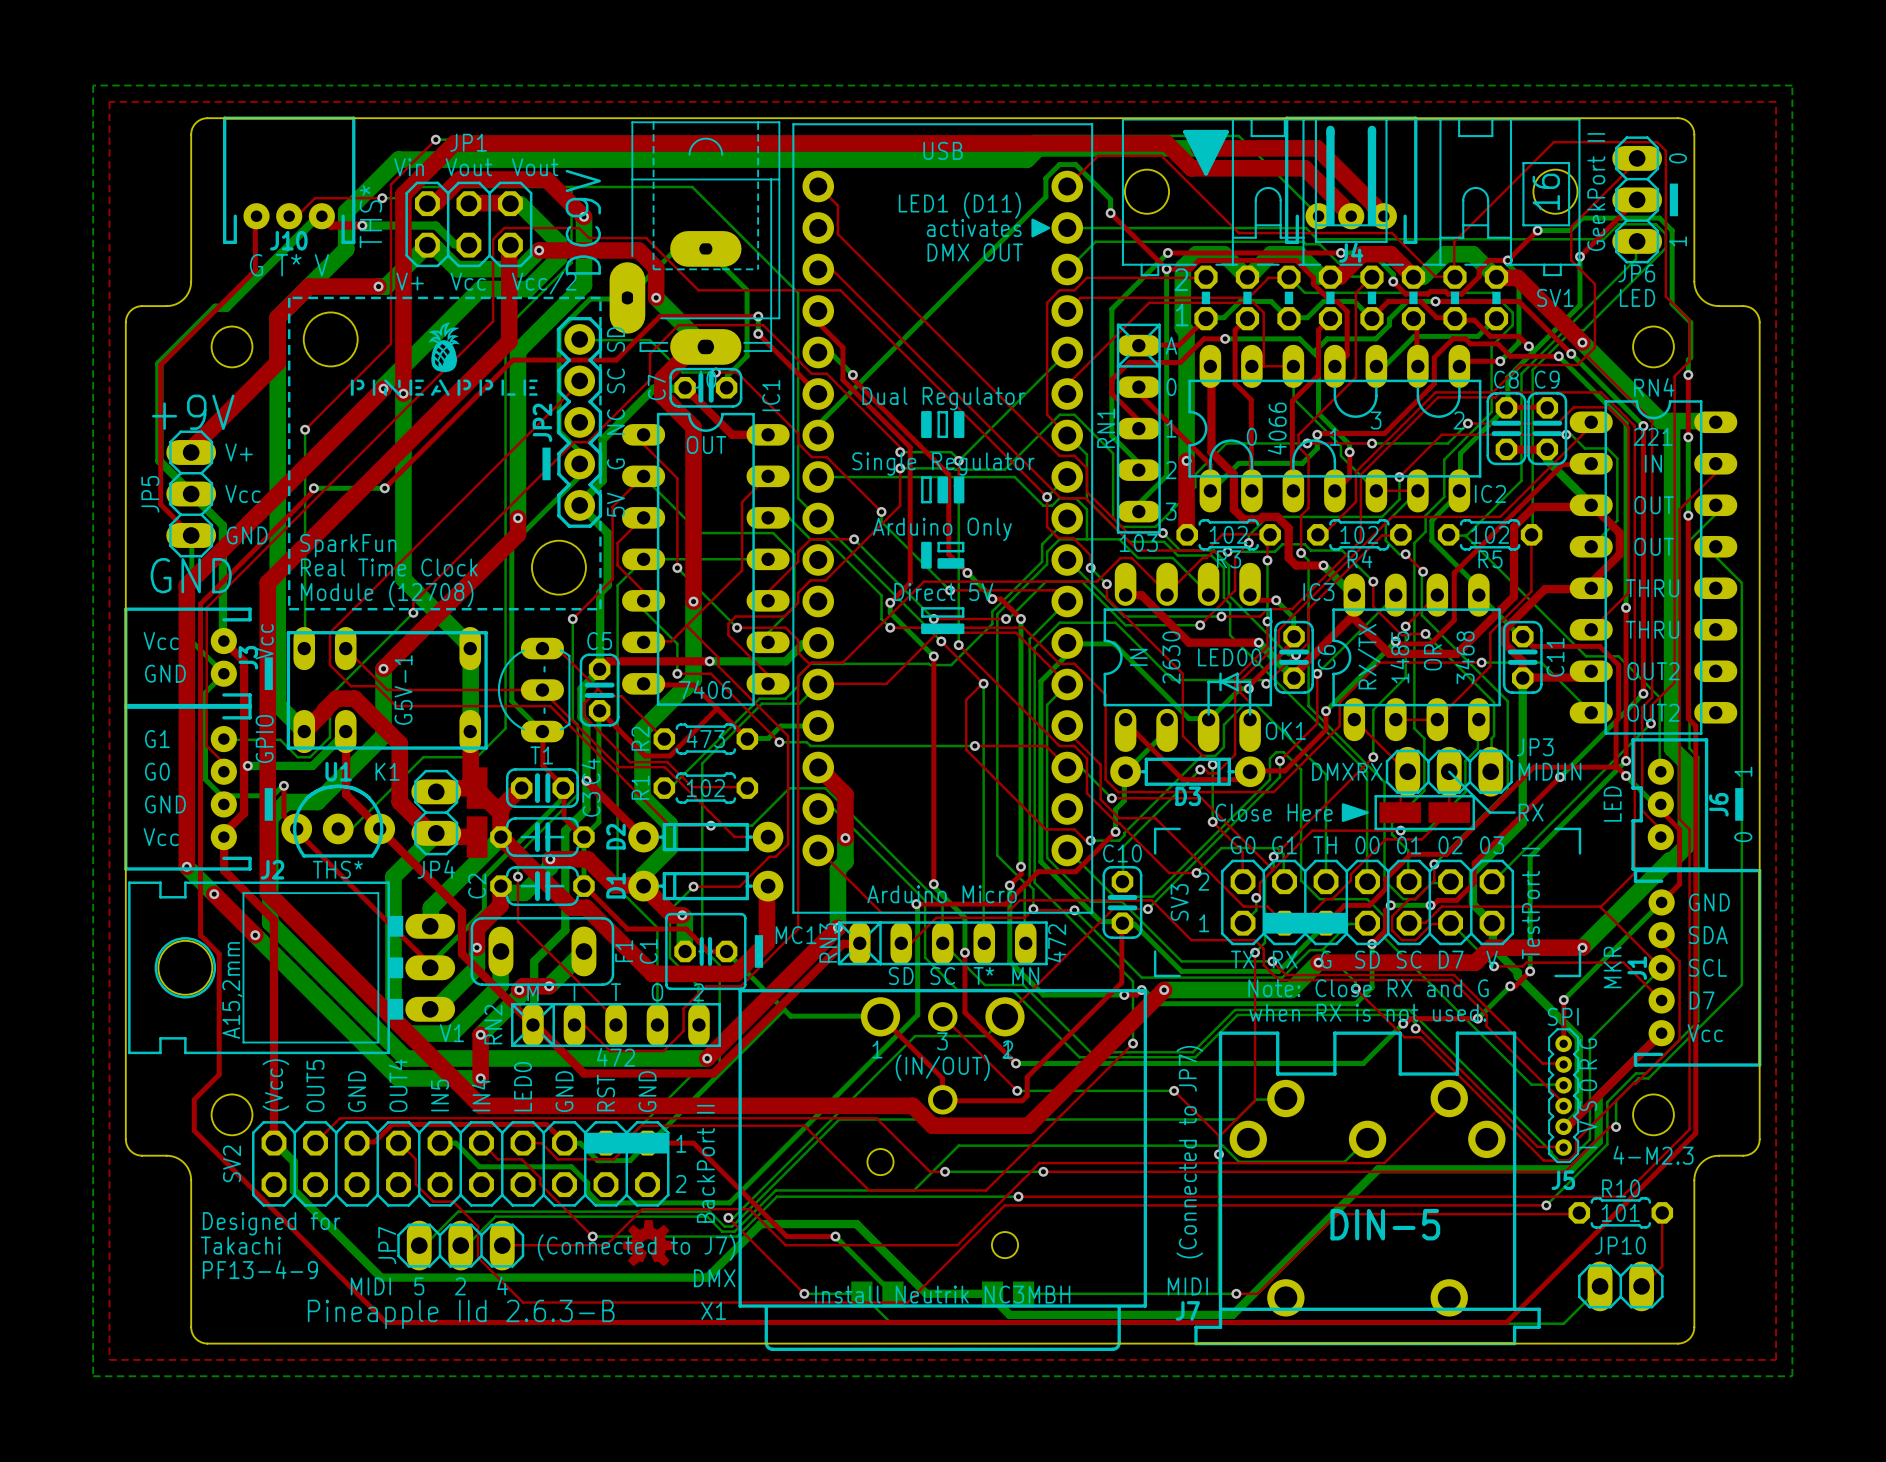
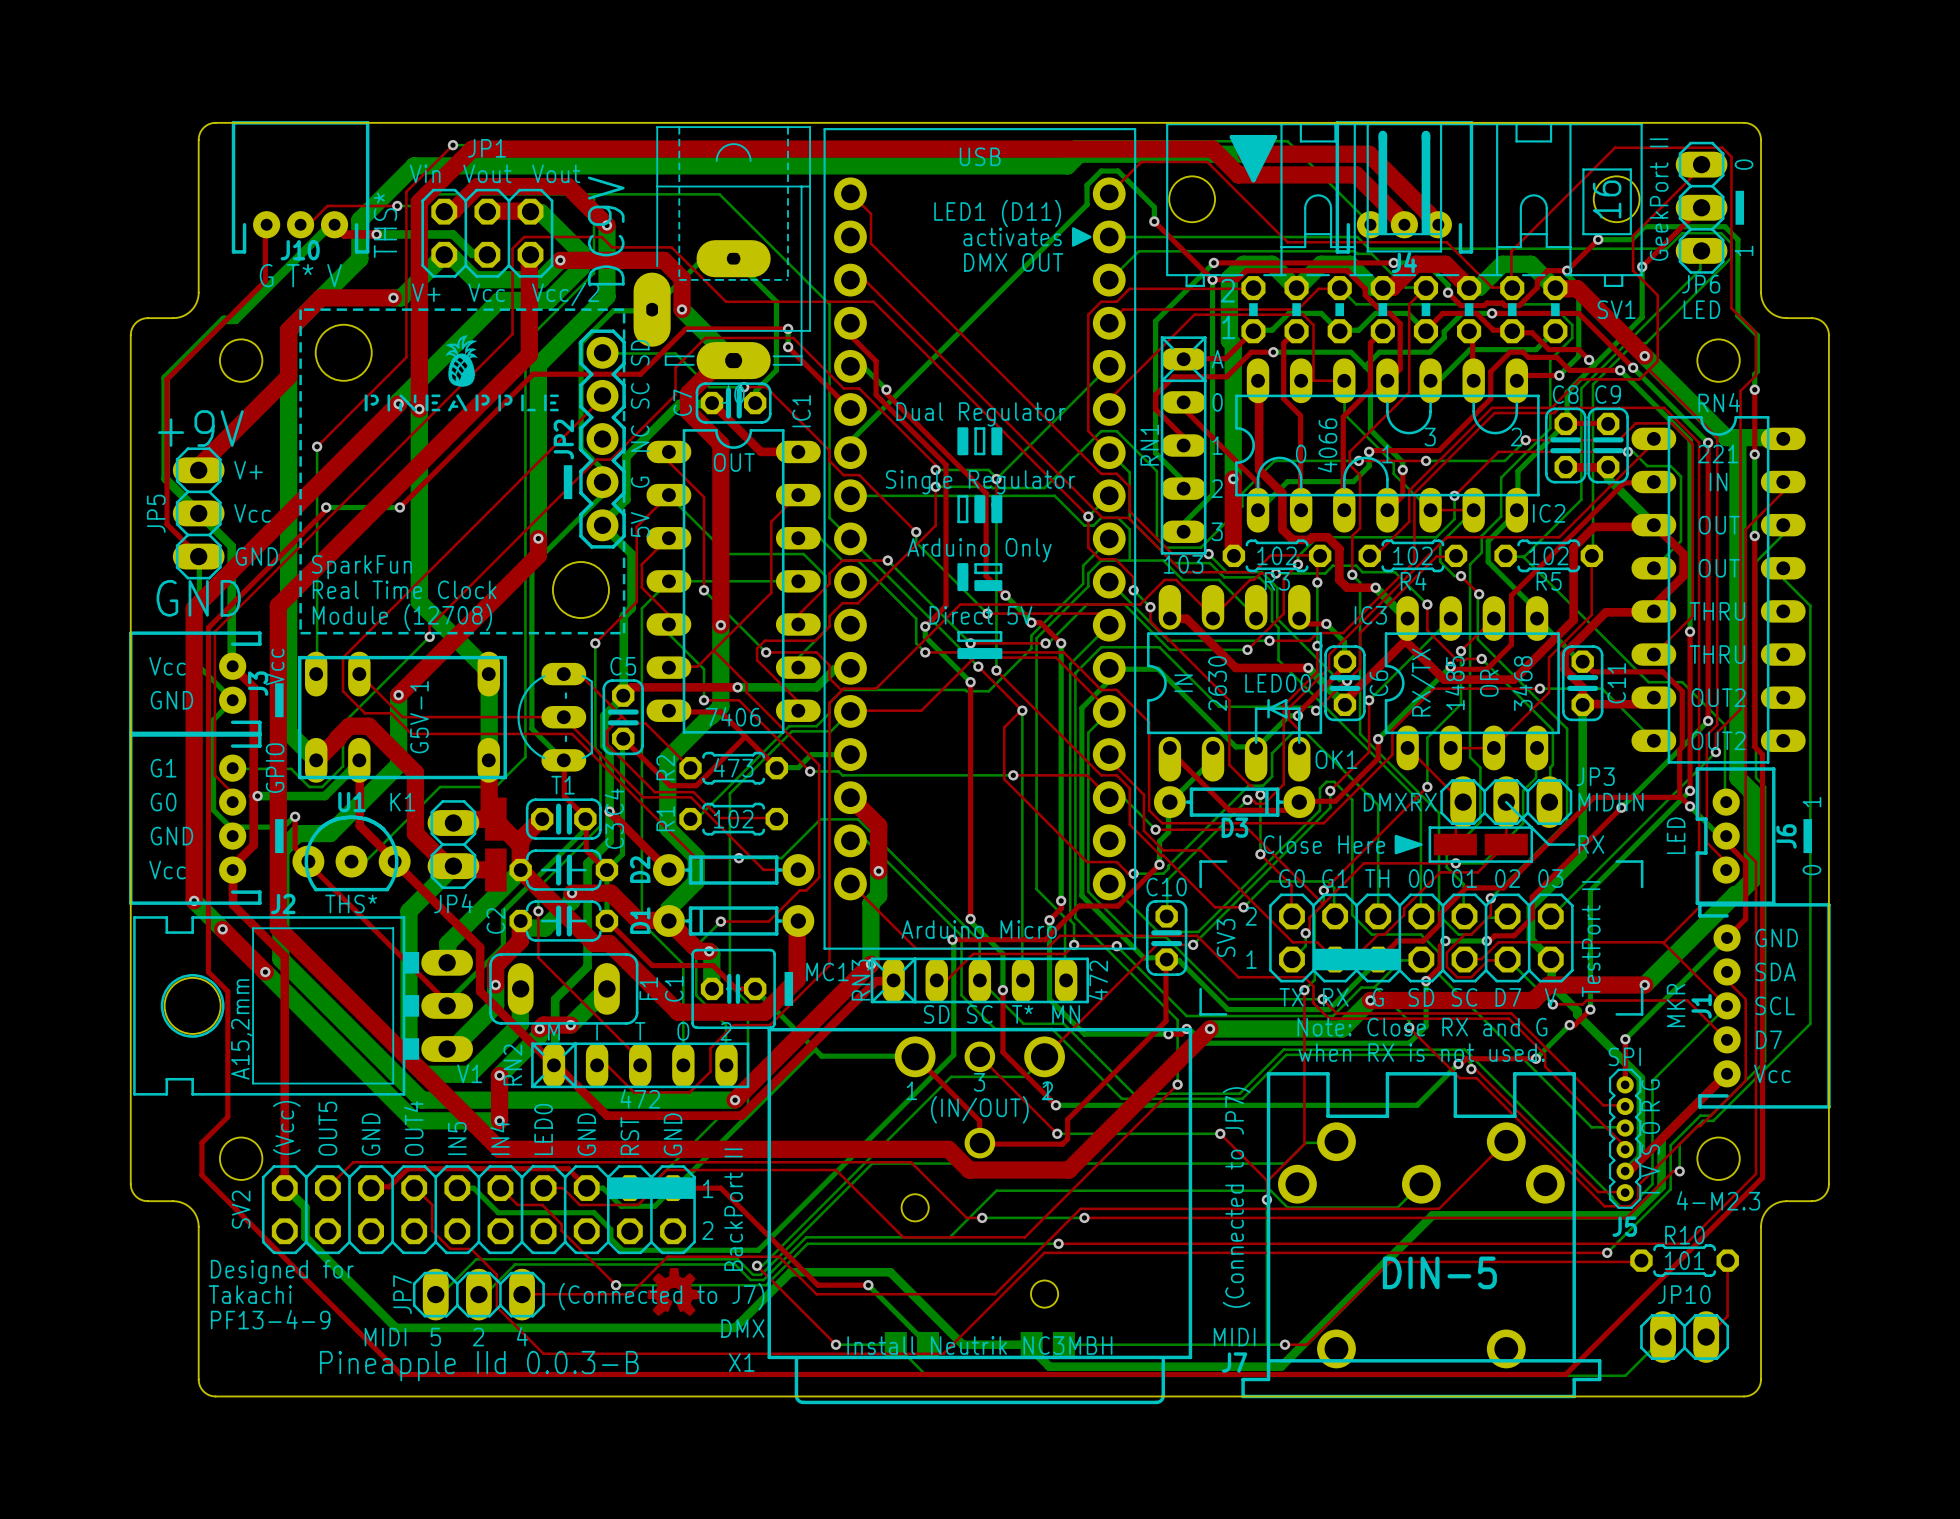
bottom zone outline: (93, 85) (1792, 85) (1792, 1376) (93, 1376) (93, 85) -> none
top zone outline: (109, 101) (1776, 101) (1776, 1359) (109, 1359) (109, 101) -> none
text: Pineapple IId 2.6.3-B (461, 1314) -> Pineapple IId 0.0.3-B (479, 1366)

